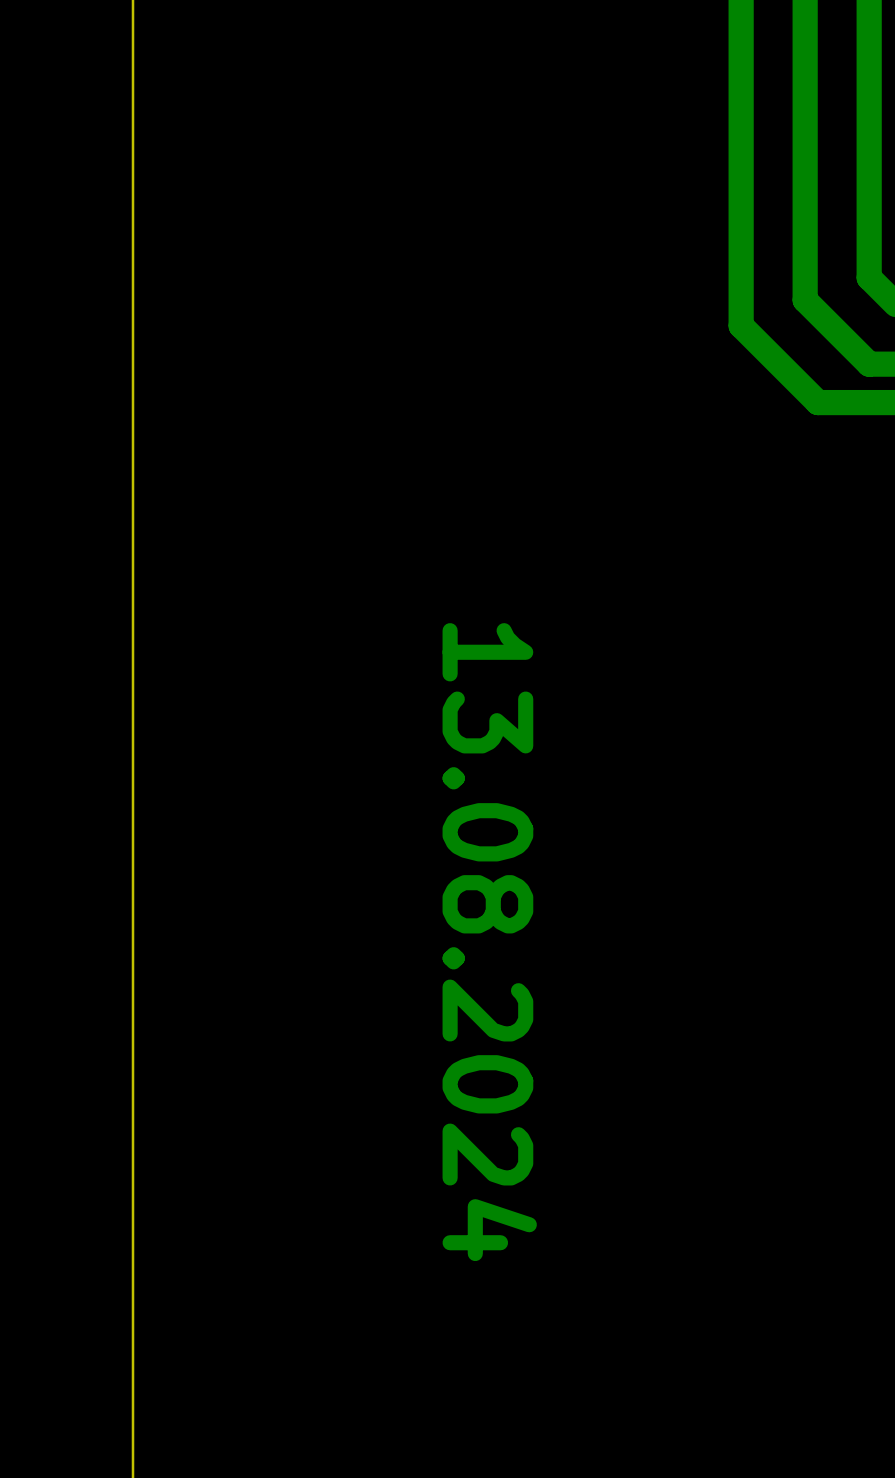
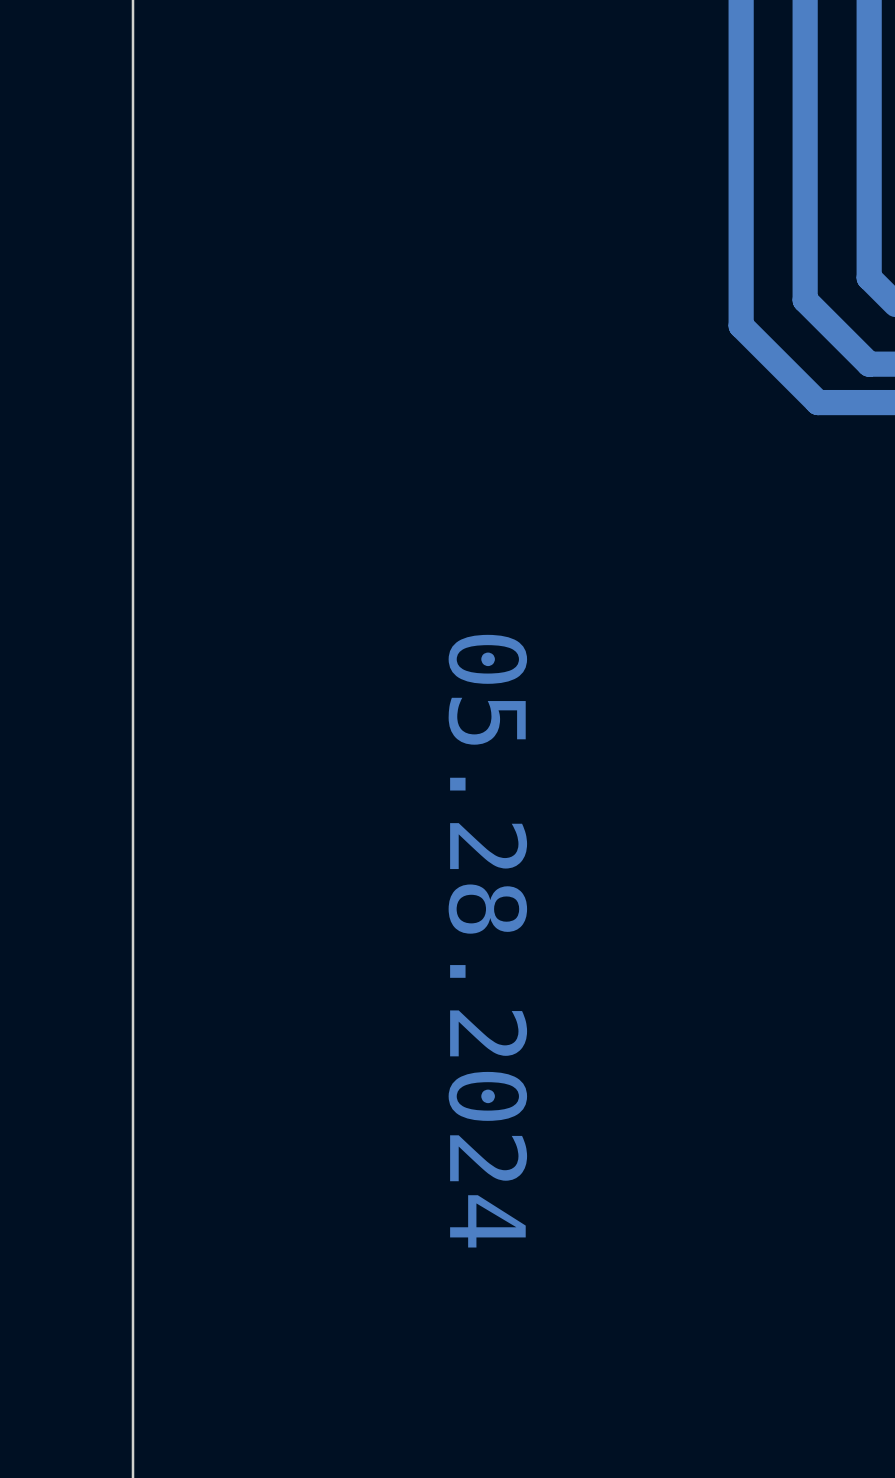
text: 13.08.2024 (489, 942) -> 05.28.2024 (487, 941)

